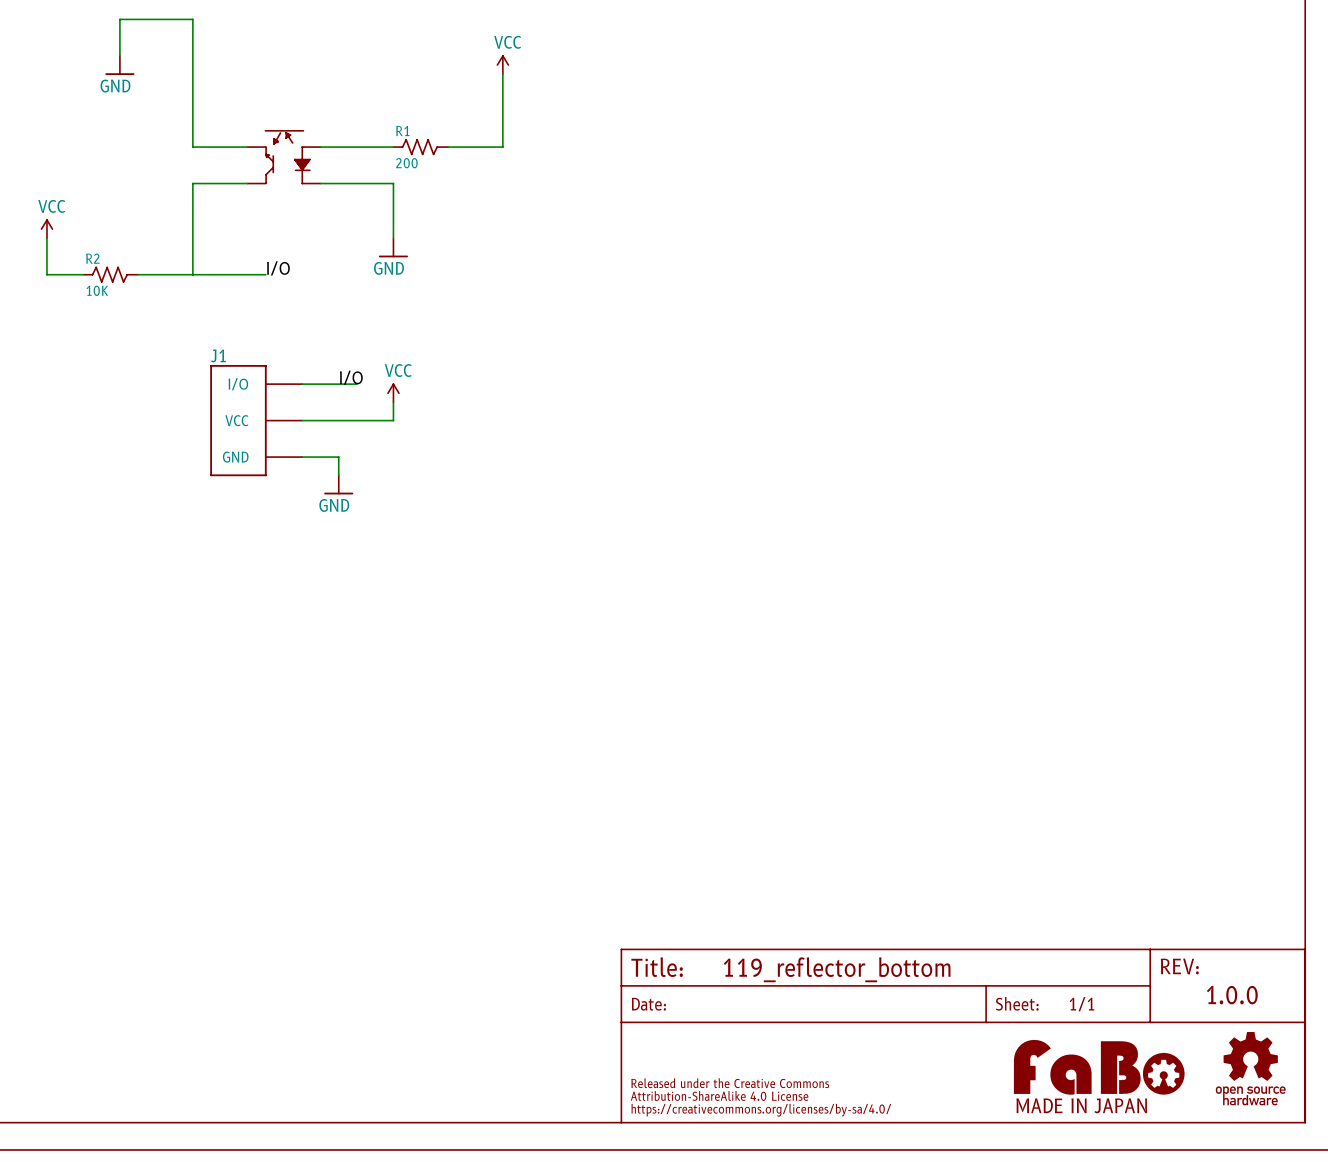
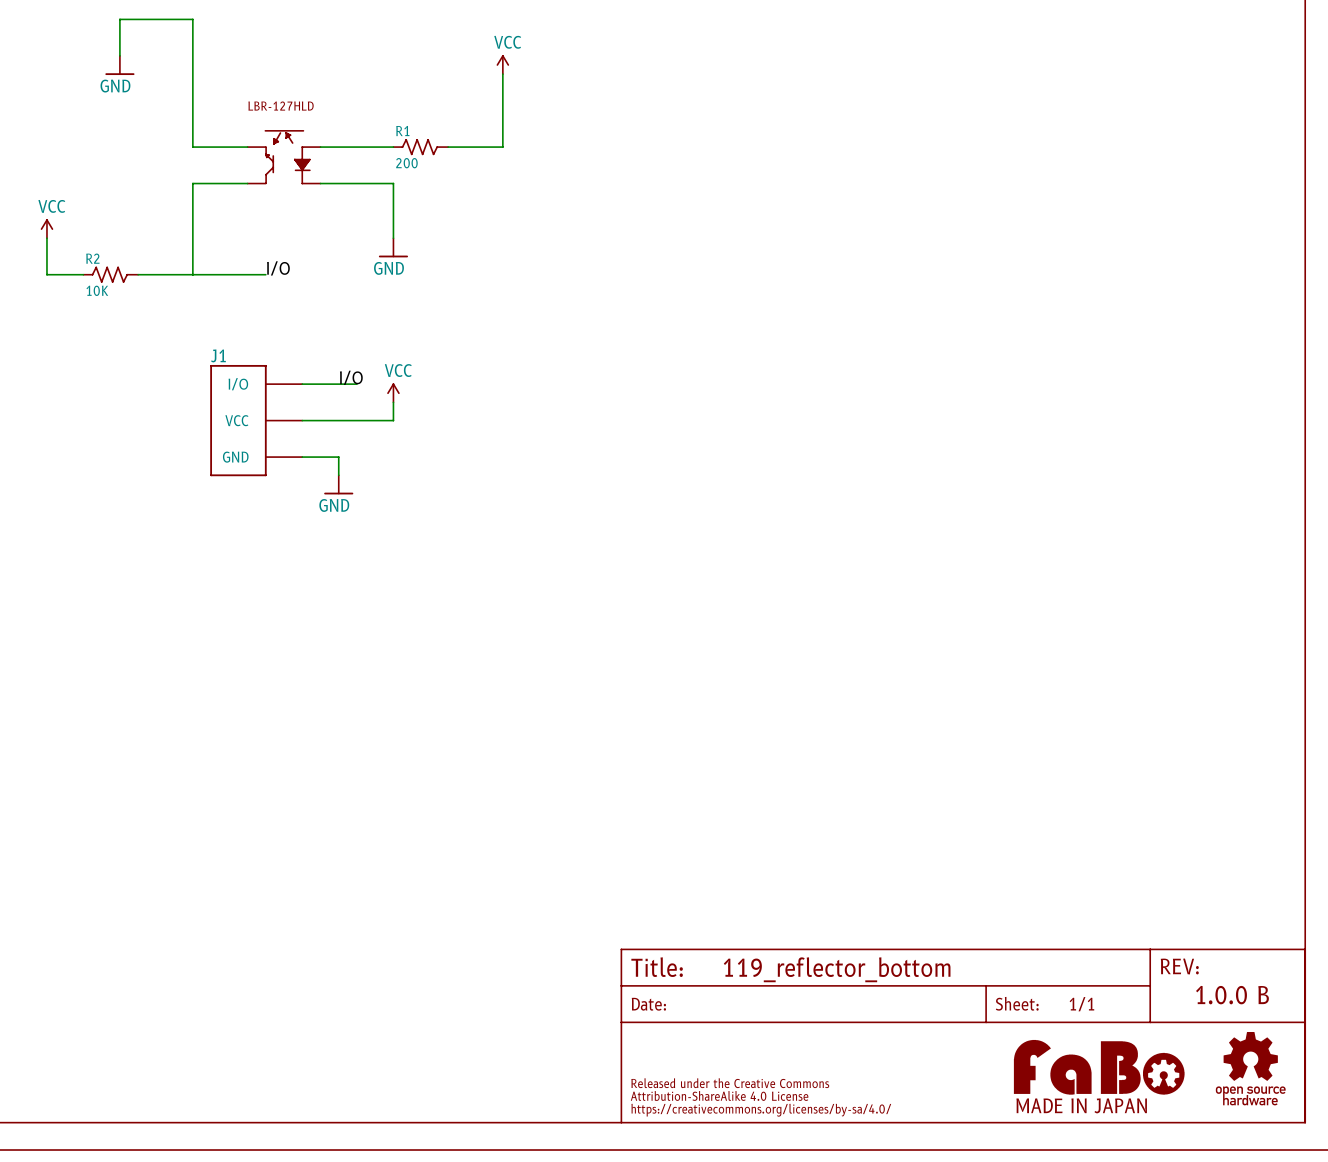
text: none -> LBR-127HLD (281, 106)
text: 1.0.0 (1232, 995) -> 1.0.0 B (1232, 995)

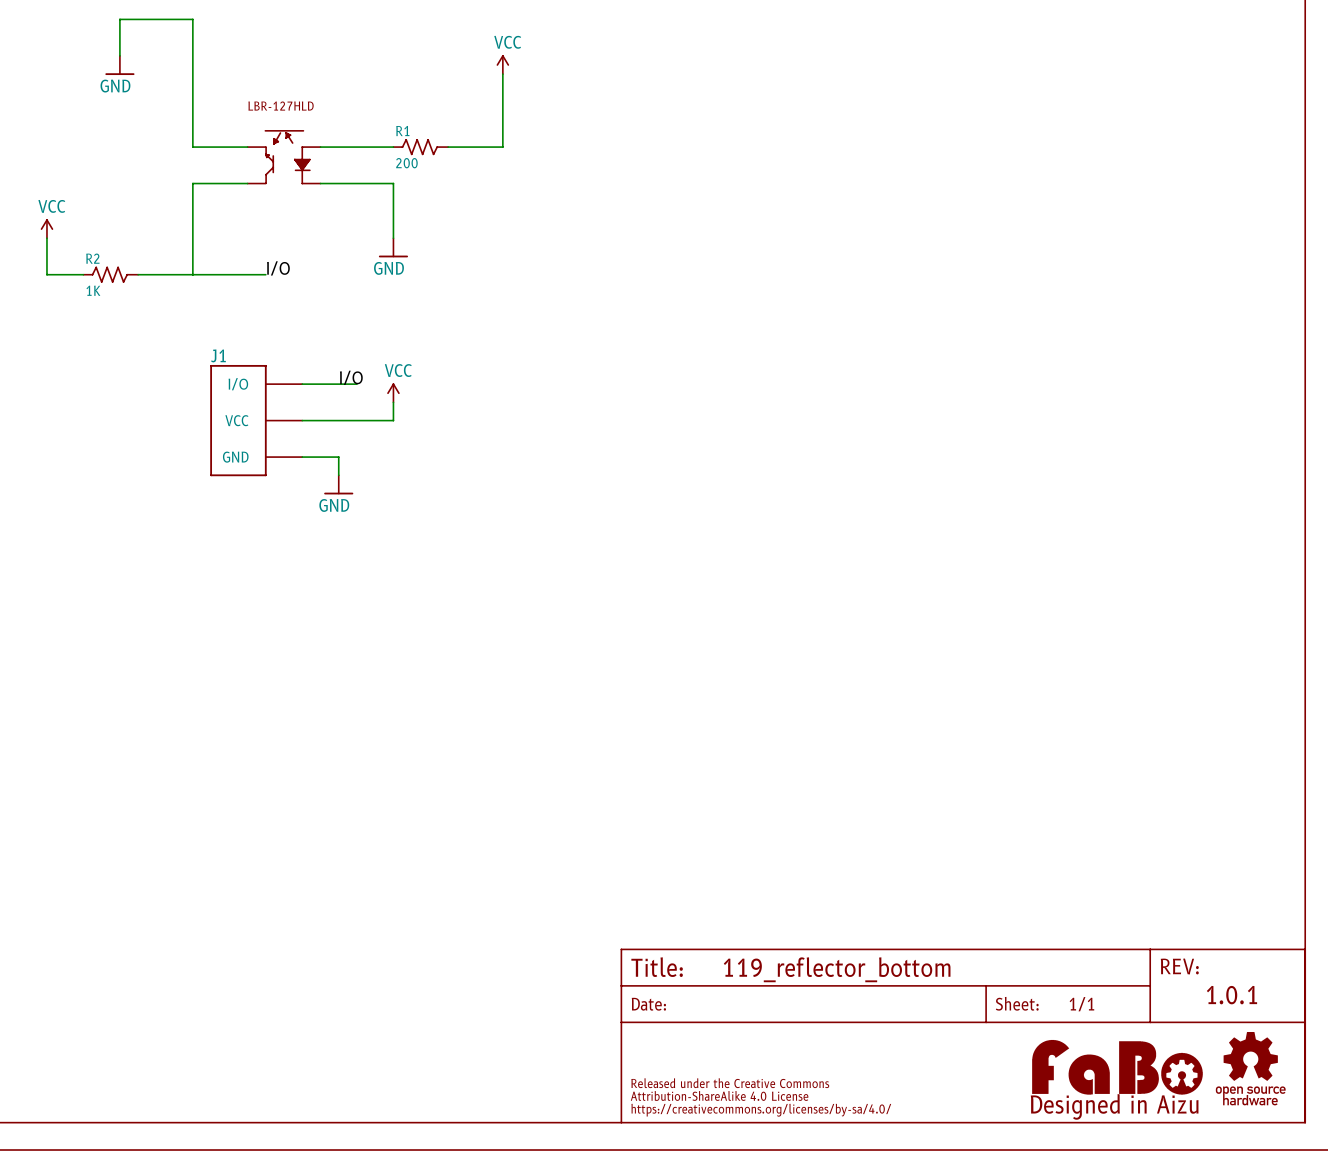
R2 value: 10K (97, 290) -> 1K (93, 290)
text: 1.0.0 B (1232, 995) -> 1.0.1 (1231, 995)
part: (1099, 1067) -> none
part: none -> (1117, 1067)

